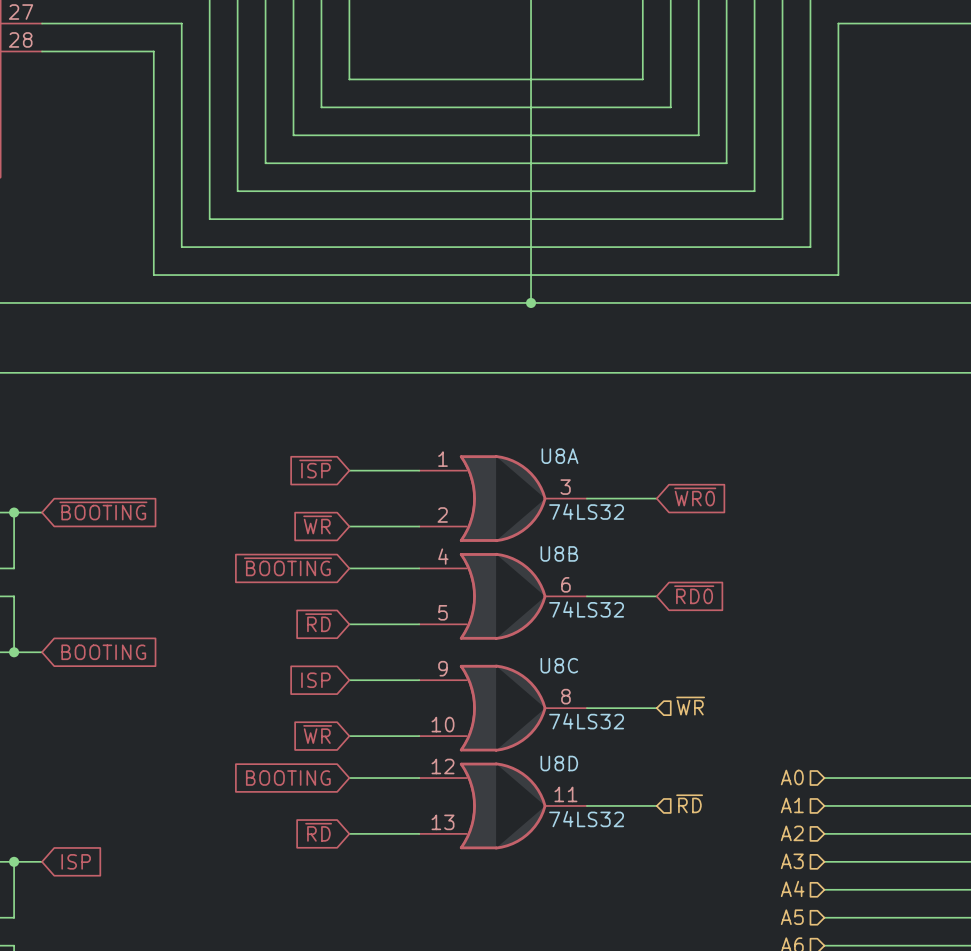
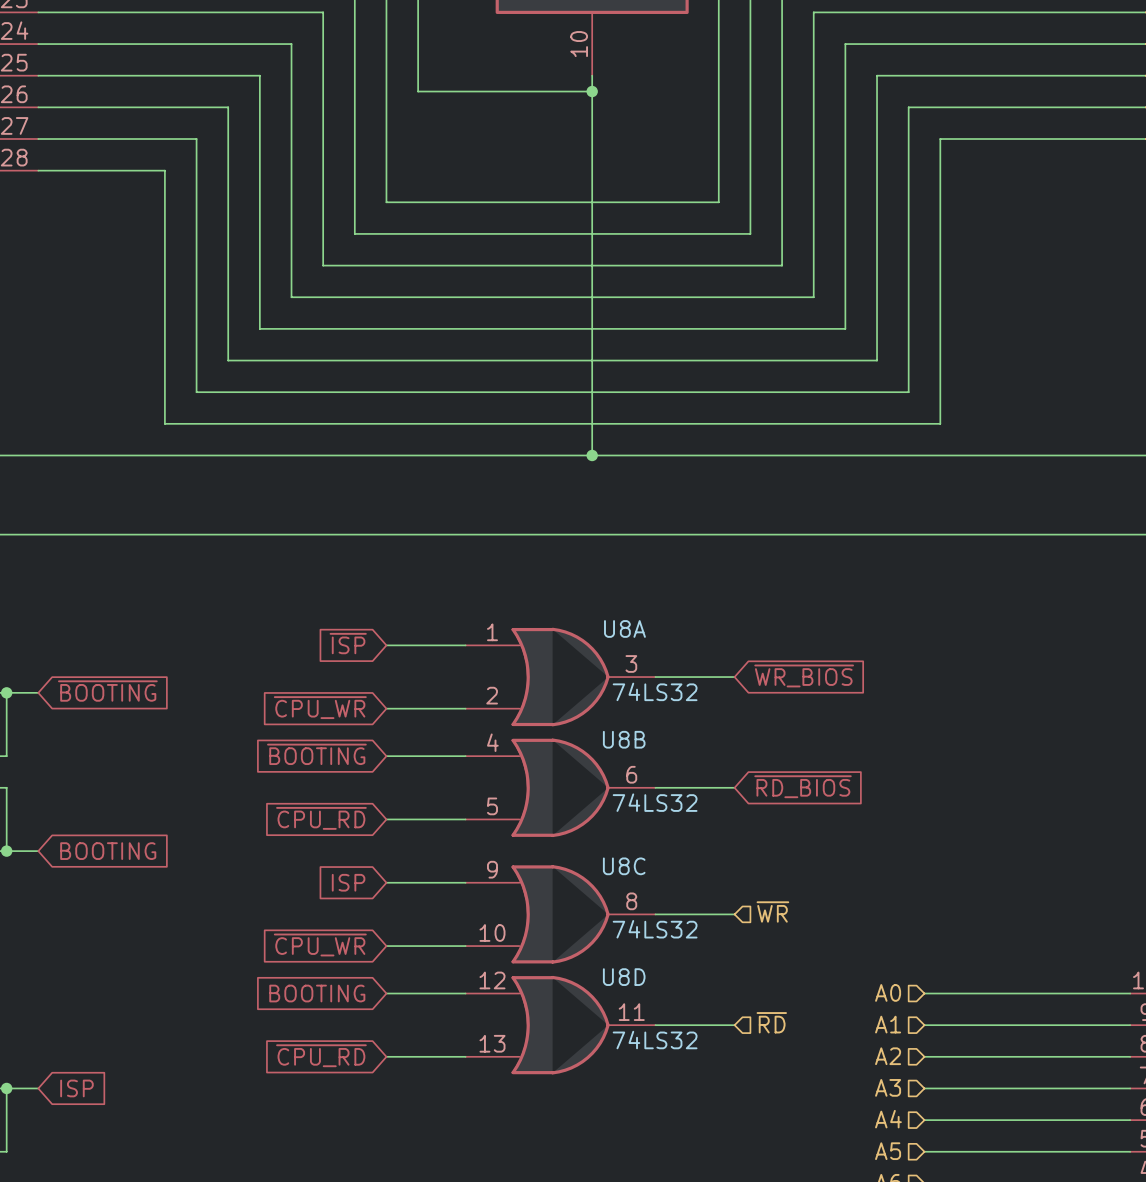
global label: ~{WR0} (695, 496) -> ~{WR_BIOS} (804, 675)
global label: ~{WR} (317, 524) -> ~{CPU_WR} (320, 707)
global label: ~{RD0} (694, 594) -> ~{RD_BIOS} (803, 786)
global label: ~{RD} (318, 622) -> ~{CPU_RD} (321, 818)
global label: ~{WR} (317, 734) -> ~{CPU_WR} (320, 944)
global label: ~{RD} (318, 832) -> ~{CPU_RD} (321, 1055)

